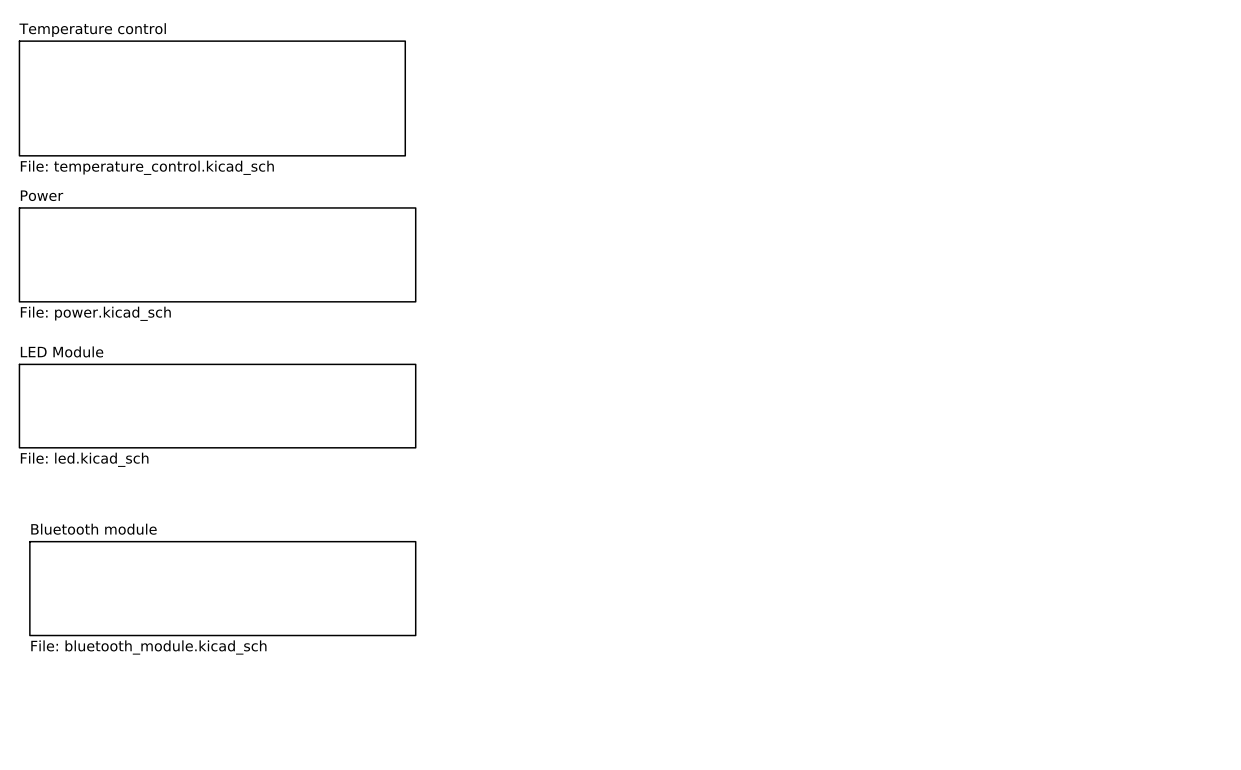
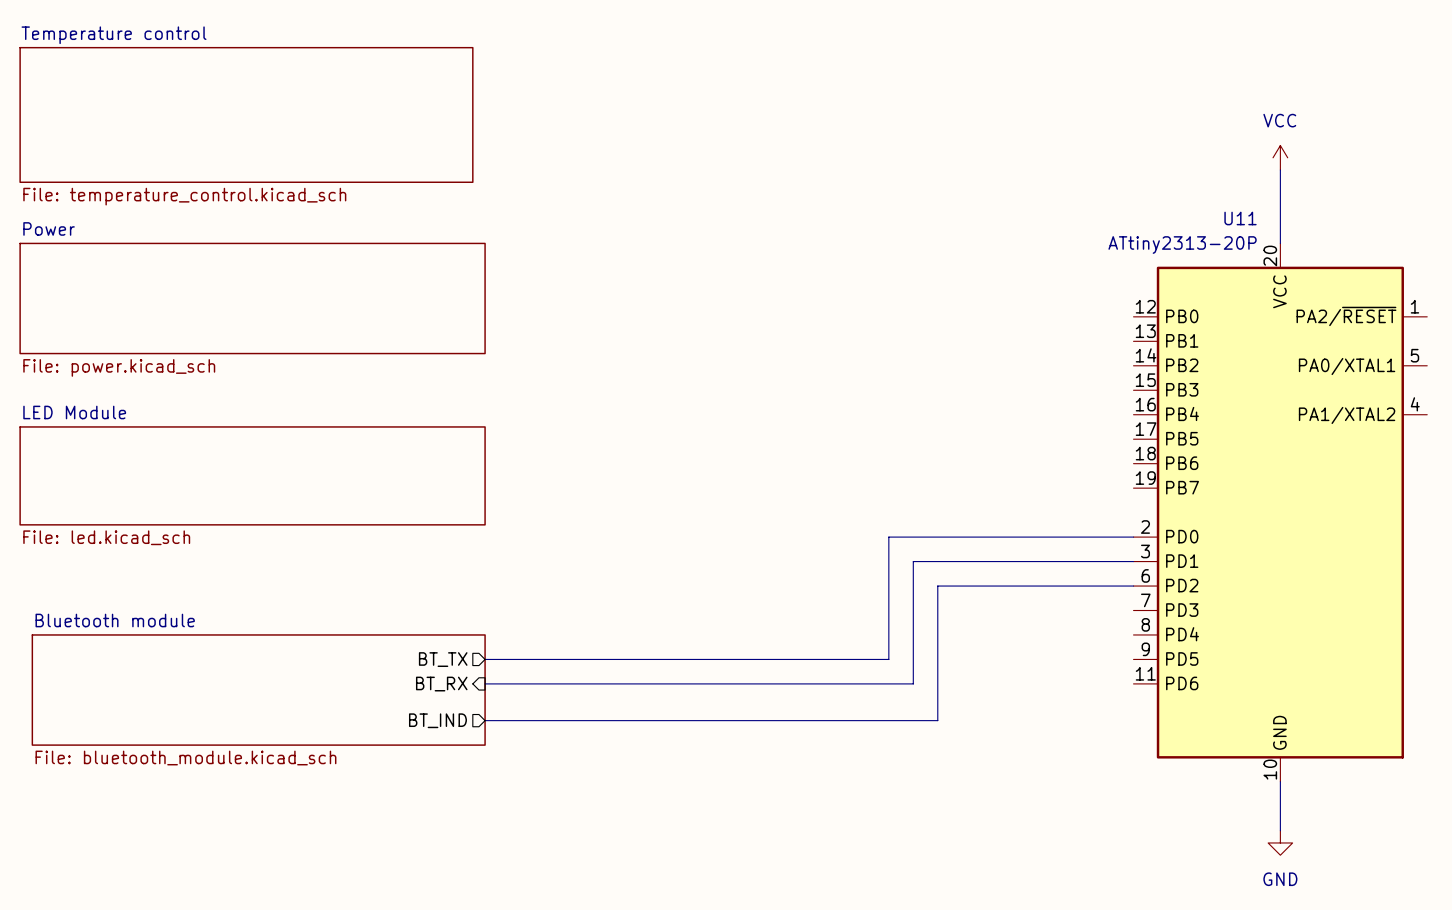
power symbol: none -> VCC (1280, 157)
wire: none -> (1280, 170) (1280, 243)
U11: none -> ATtiny2313-20P (1280, 512)
wire: none -> (1133, 537) (888, 537) (888, 659) (485, 659)
wire: none -> (1133, 561) (913, 561) (913, 683) (485, 683)
wire: none -> (1133, 586) (937, 586) (937, 720) (485, 720)
sheet pin: none -> BT_TX (443, 659)
sheet pin: none -> BT_RX (441, 684)
sheet pin: none -> BT_IND (437, 720)
wire: none -> (1280, 781) (1280, 830)
power symbol: none -> GND (1280, 842)

